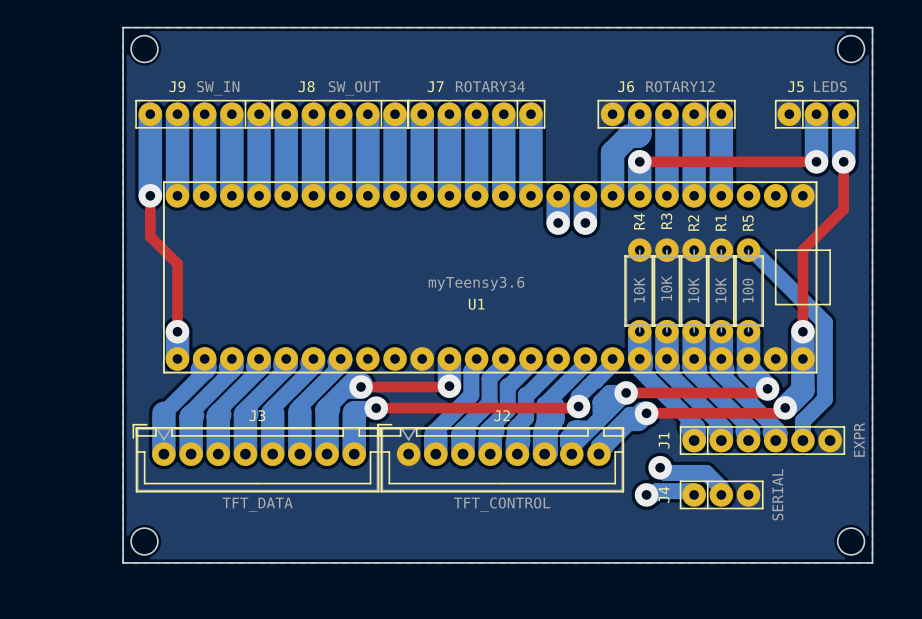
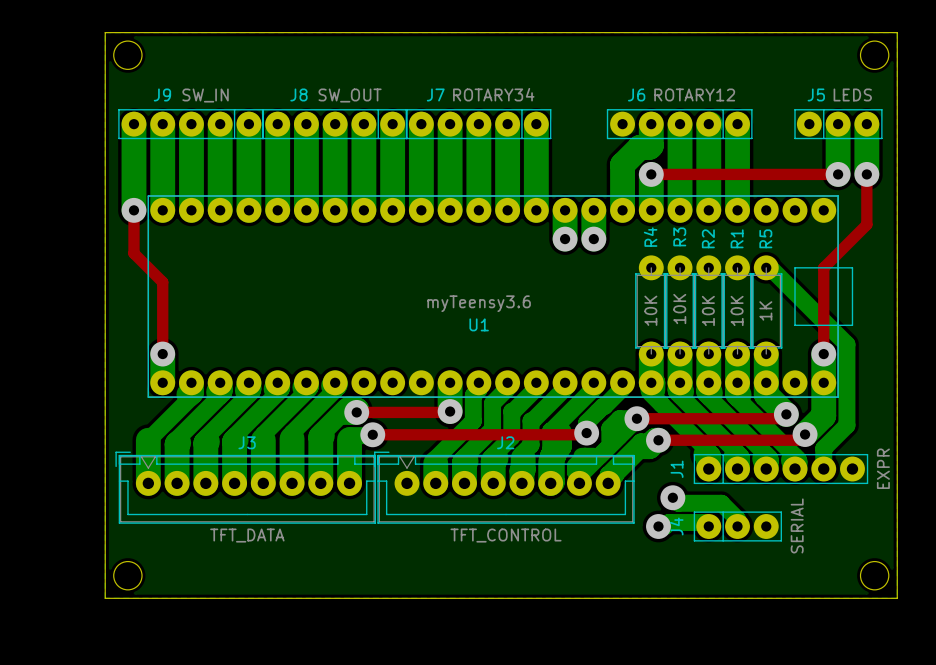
R5 value: 100 (748, 290) -> 1K (765, 310)

